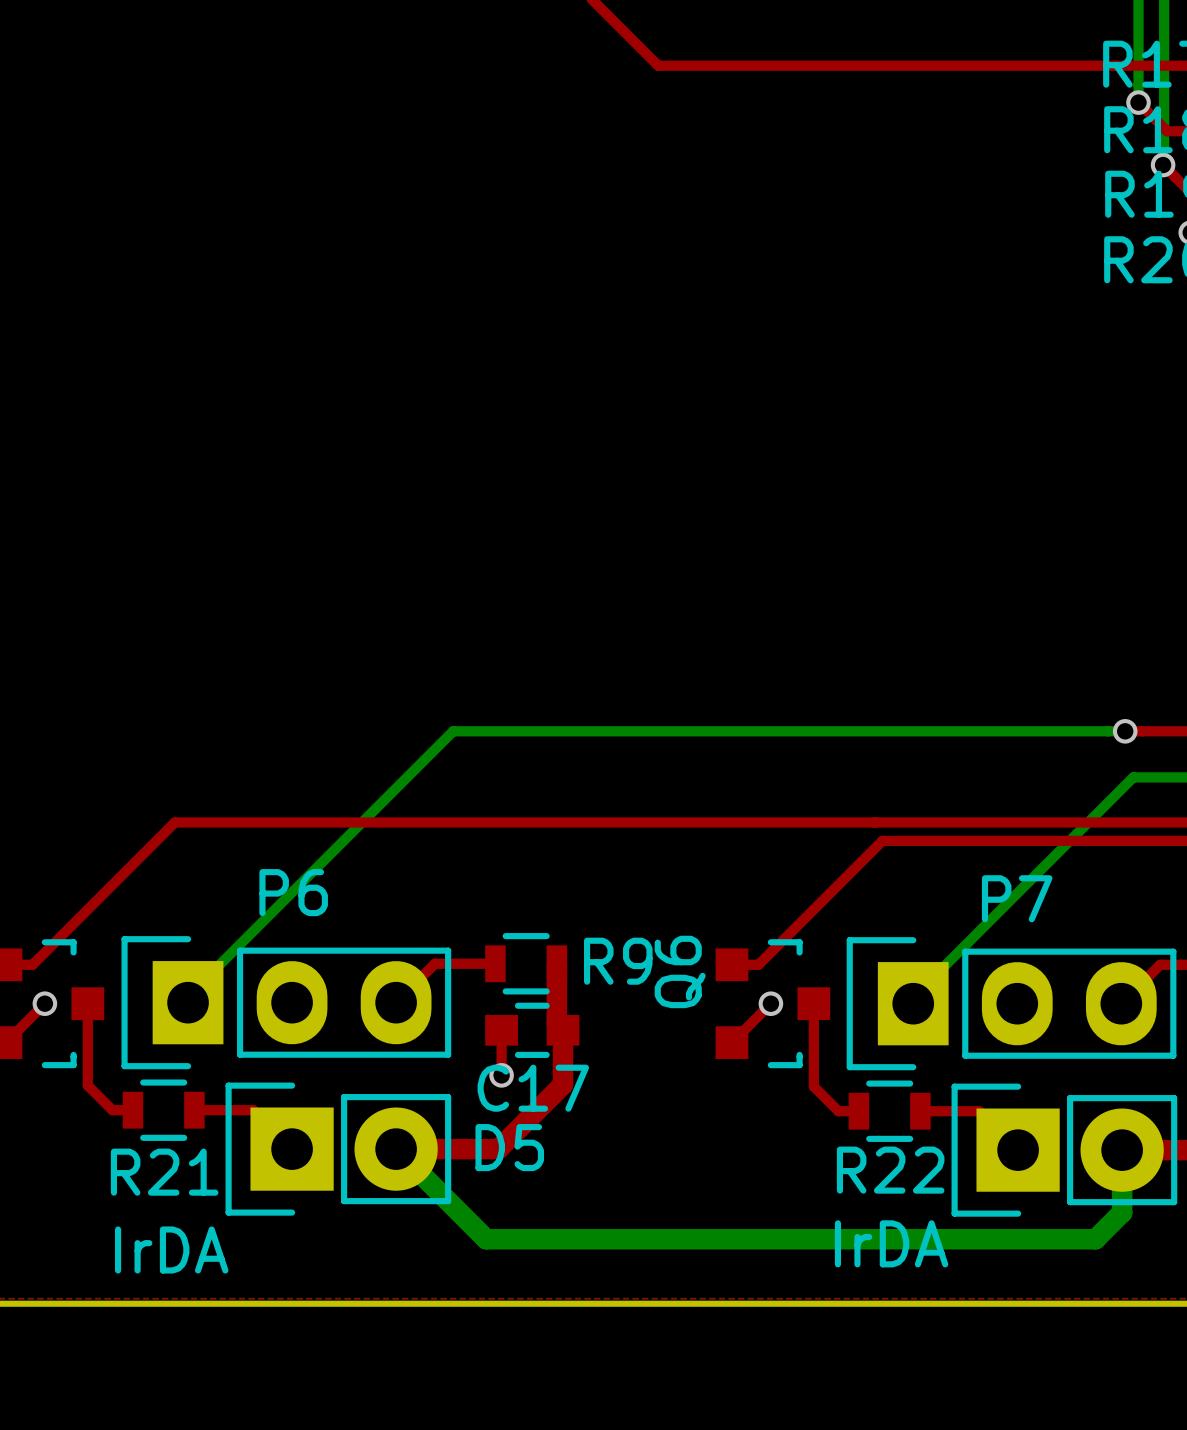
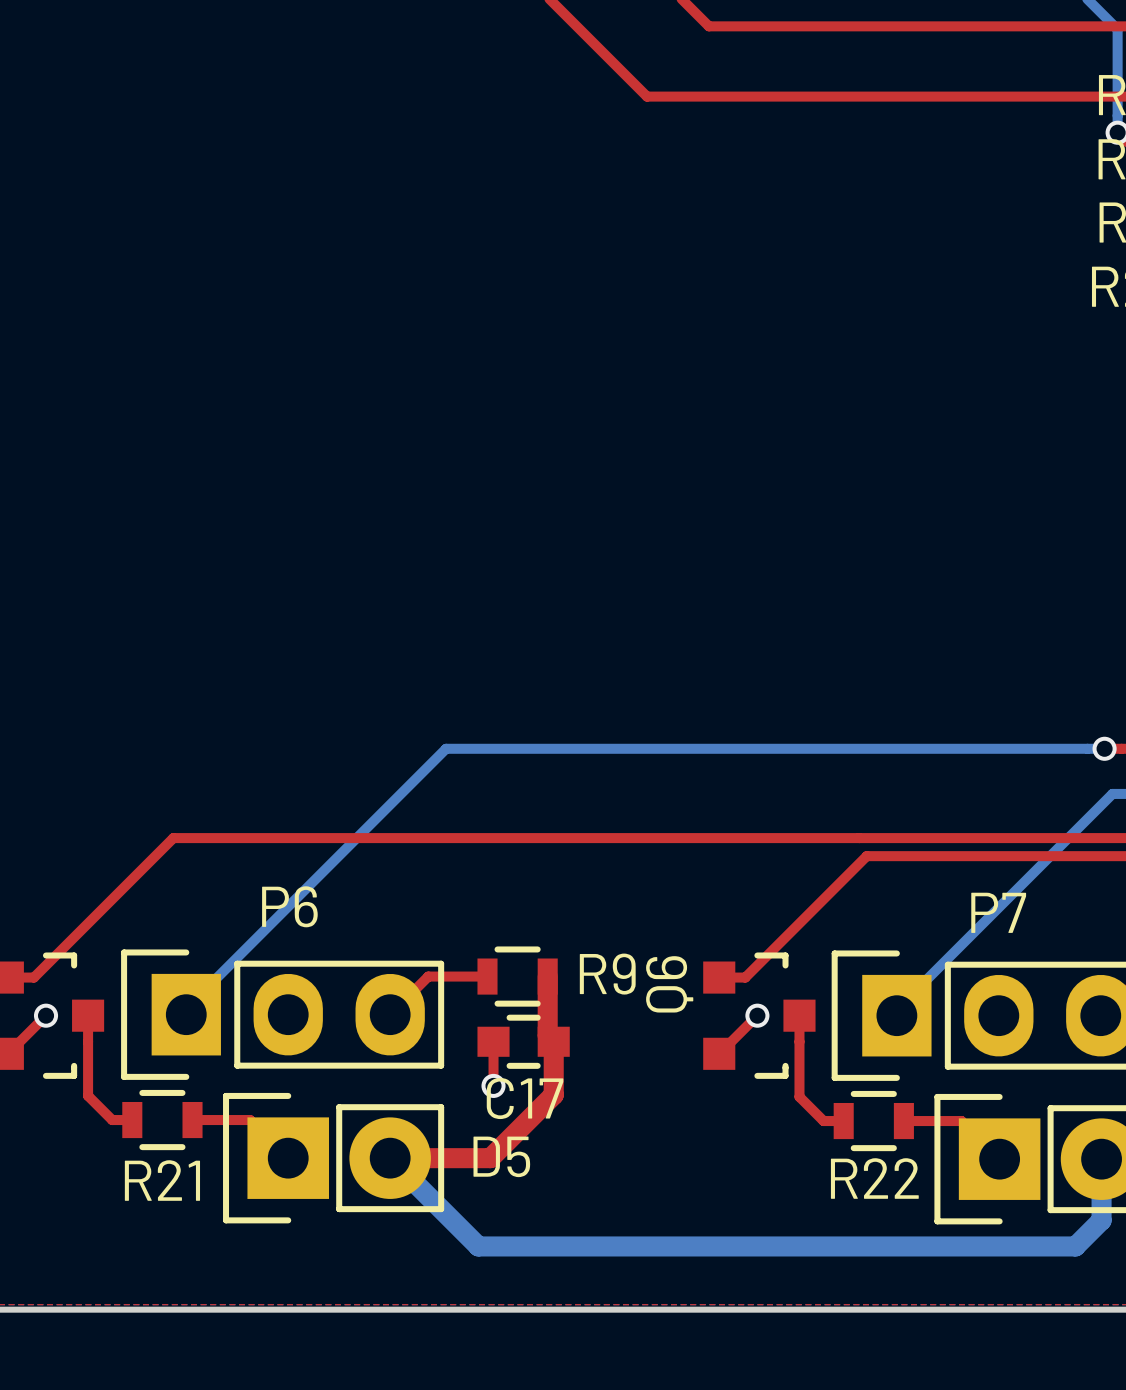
part value: IrDA (891, 1243) -> none
D5 value: IrDA (171, 1249) -> none

